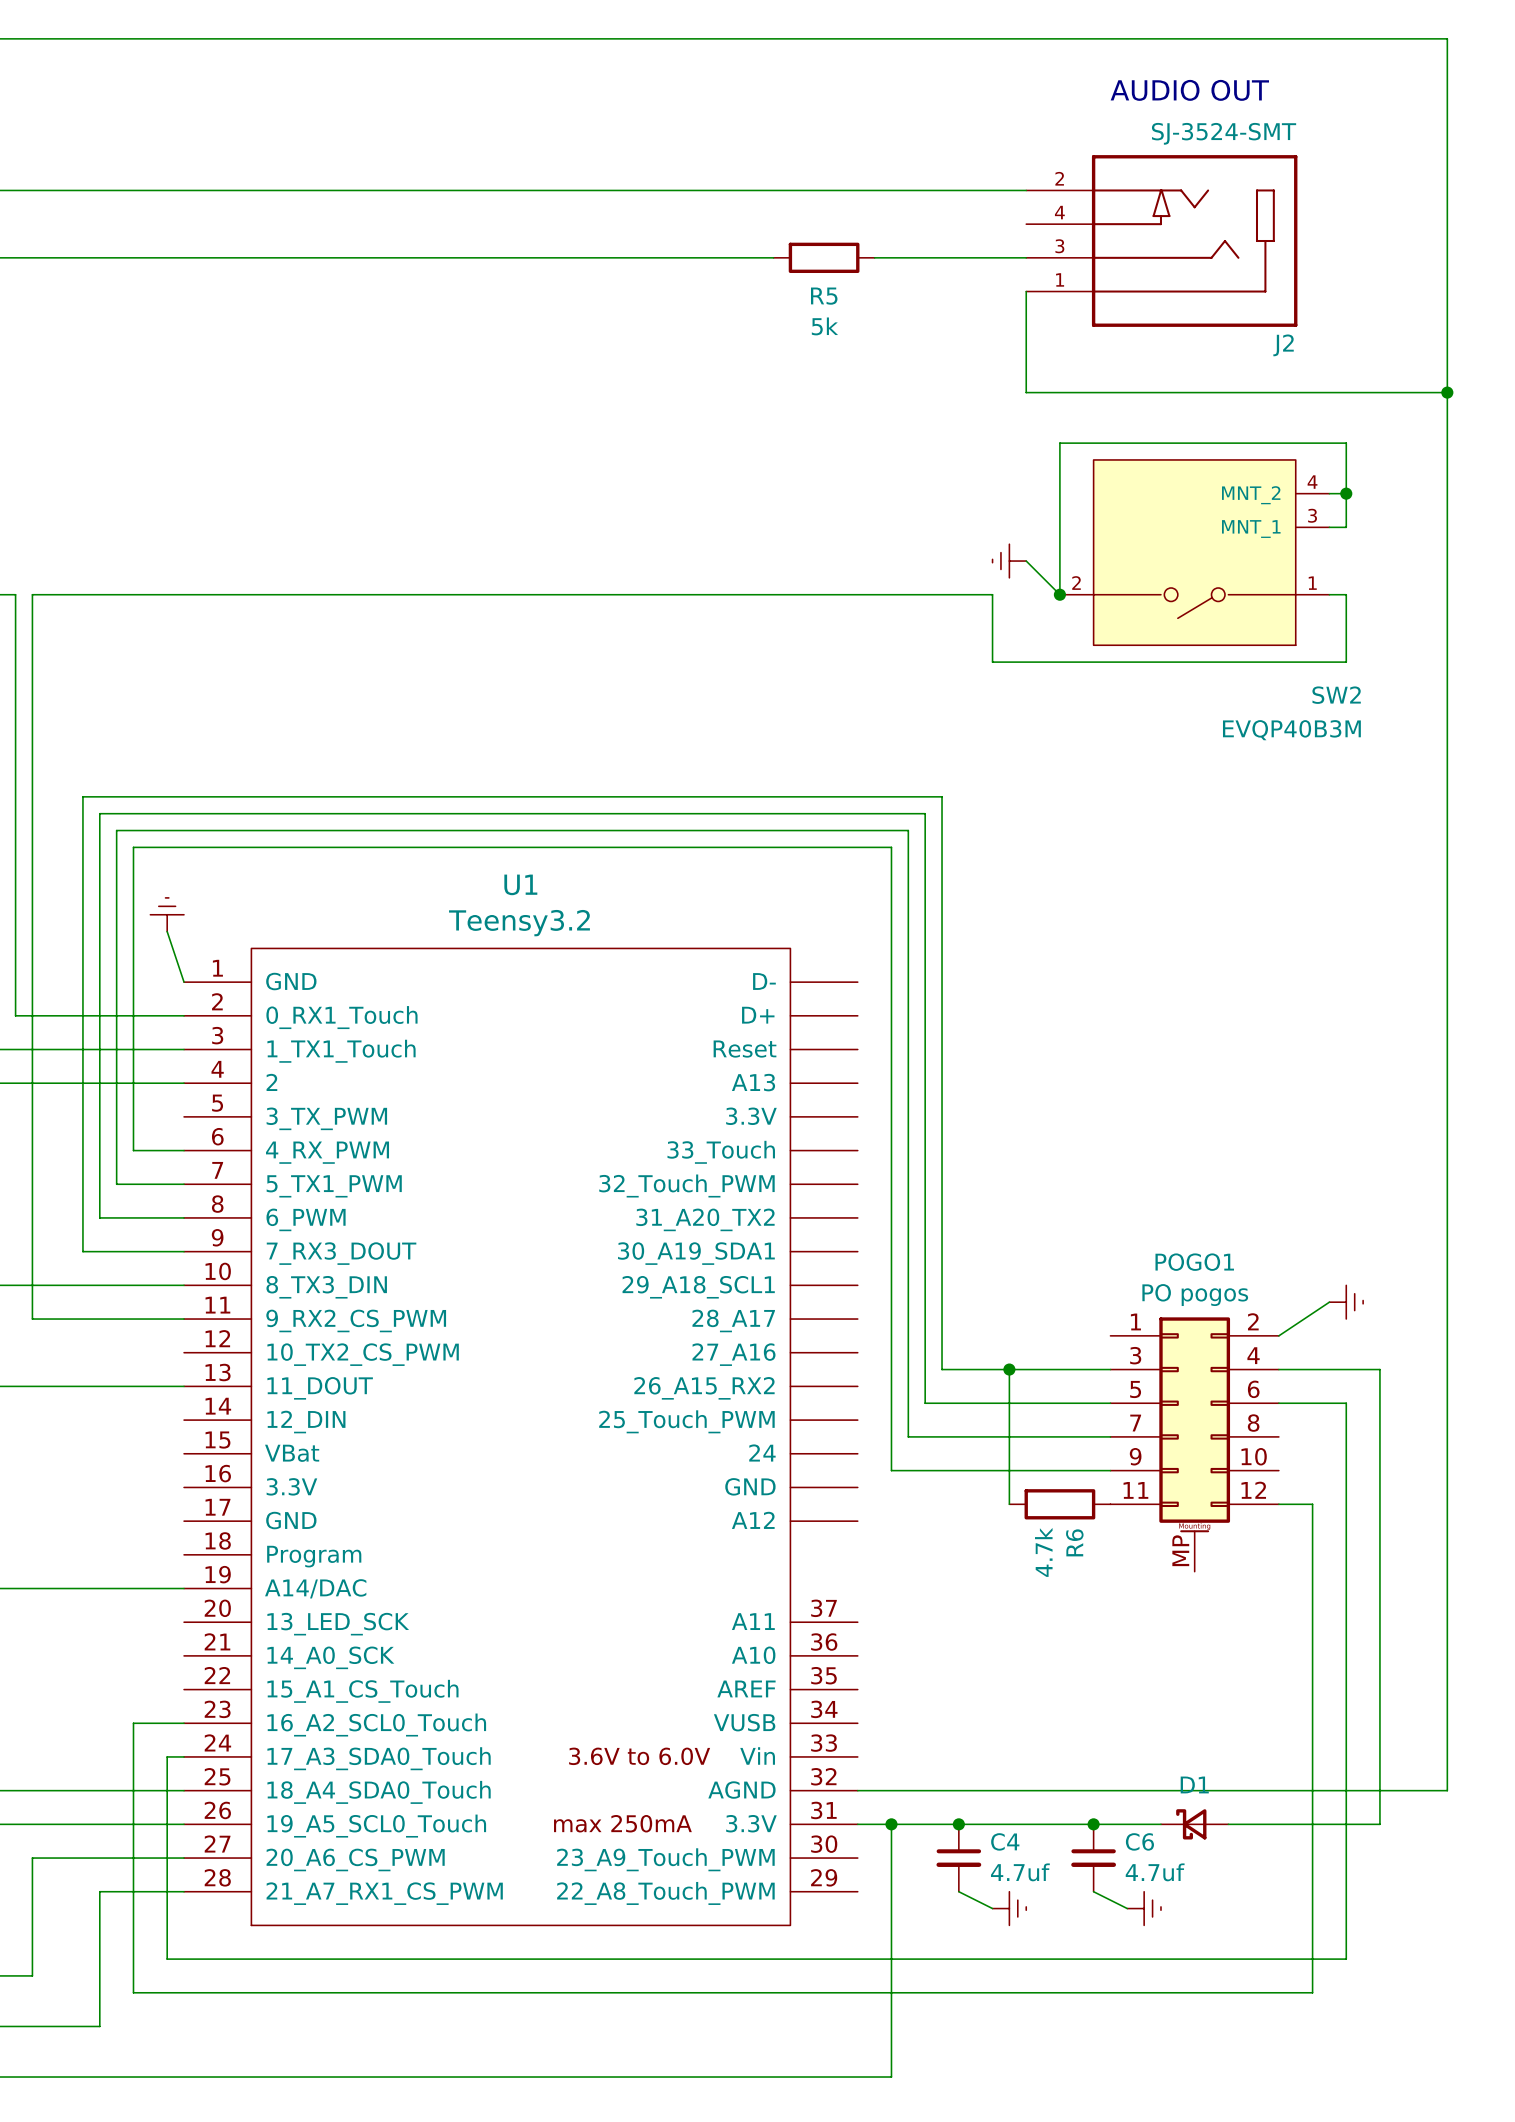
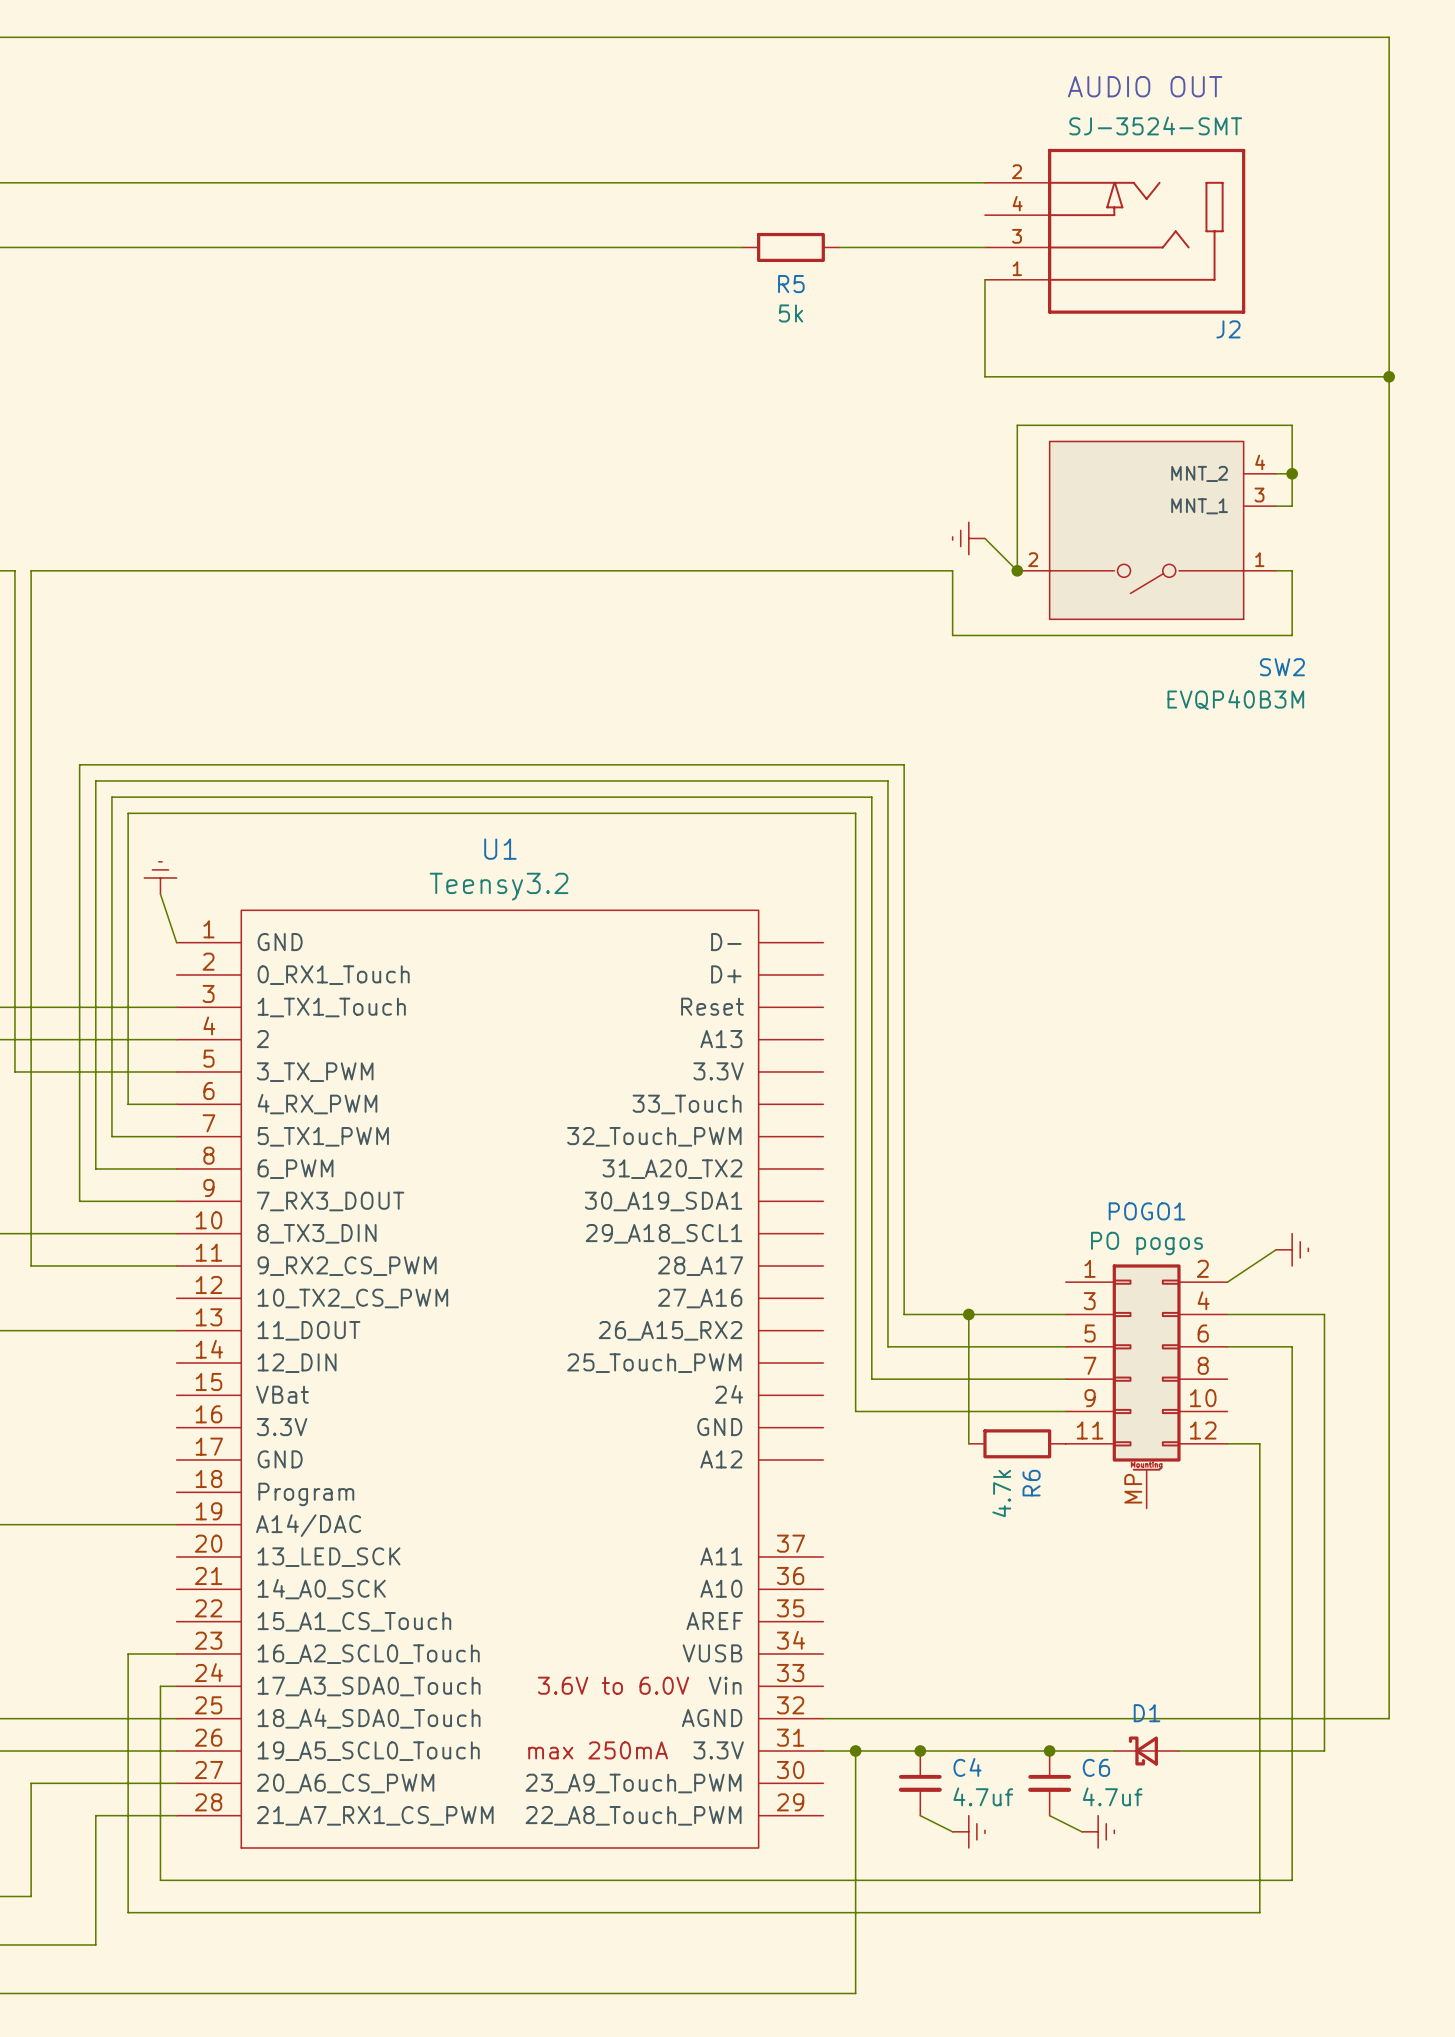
wire: (15, 1015) (184, 1015) -> (14, 974) (14, 1071) (176, 1071)

